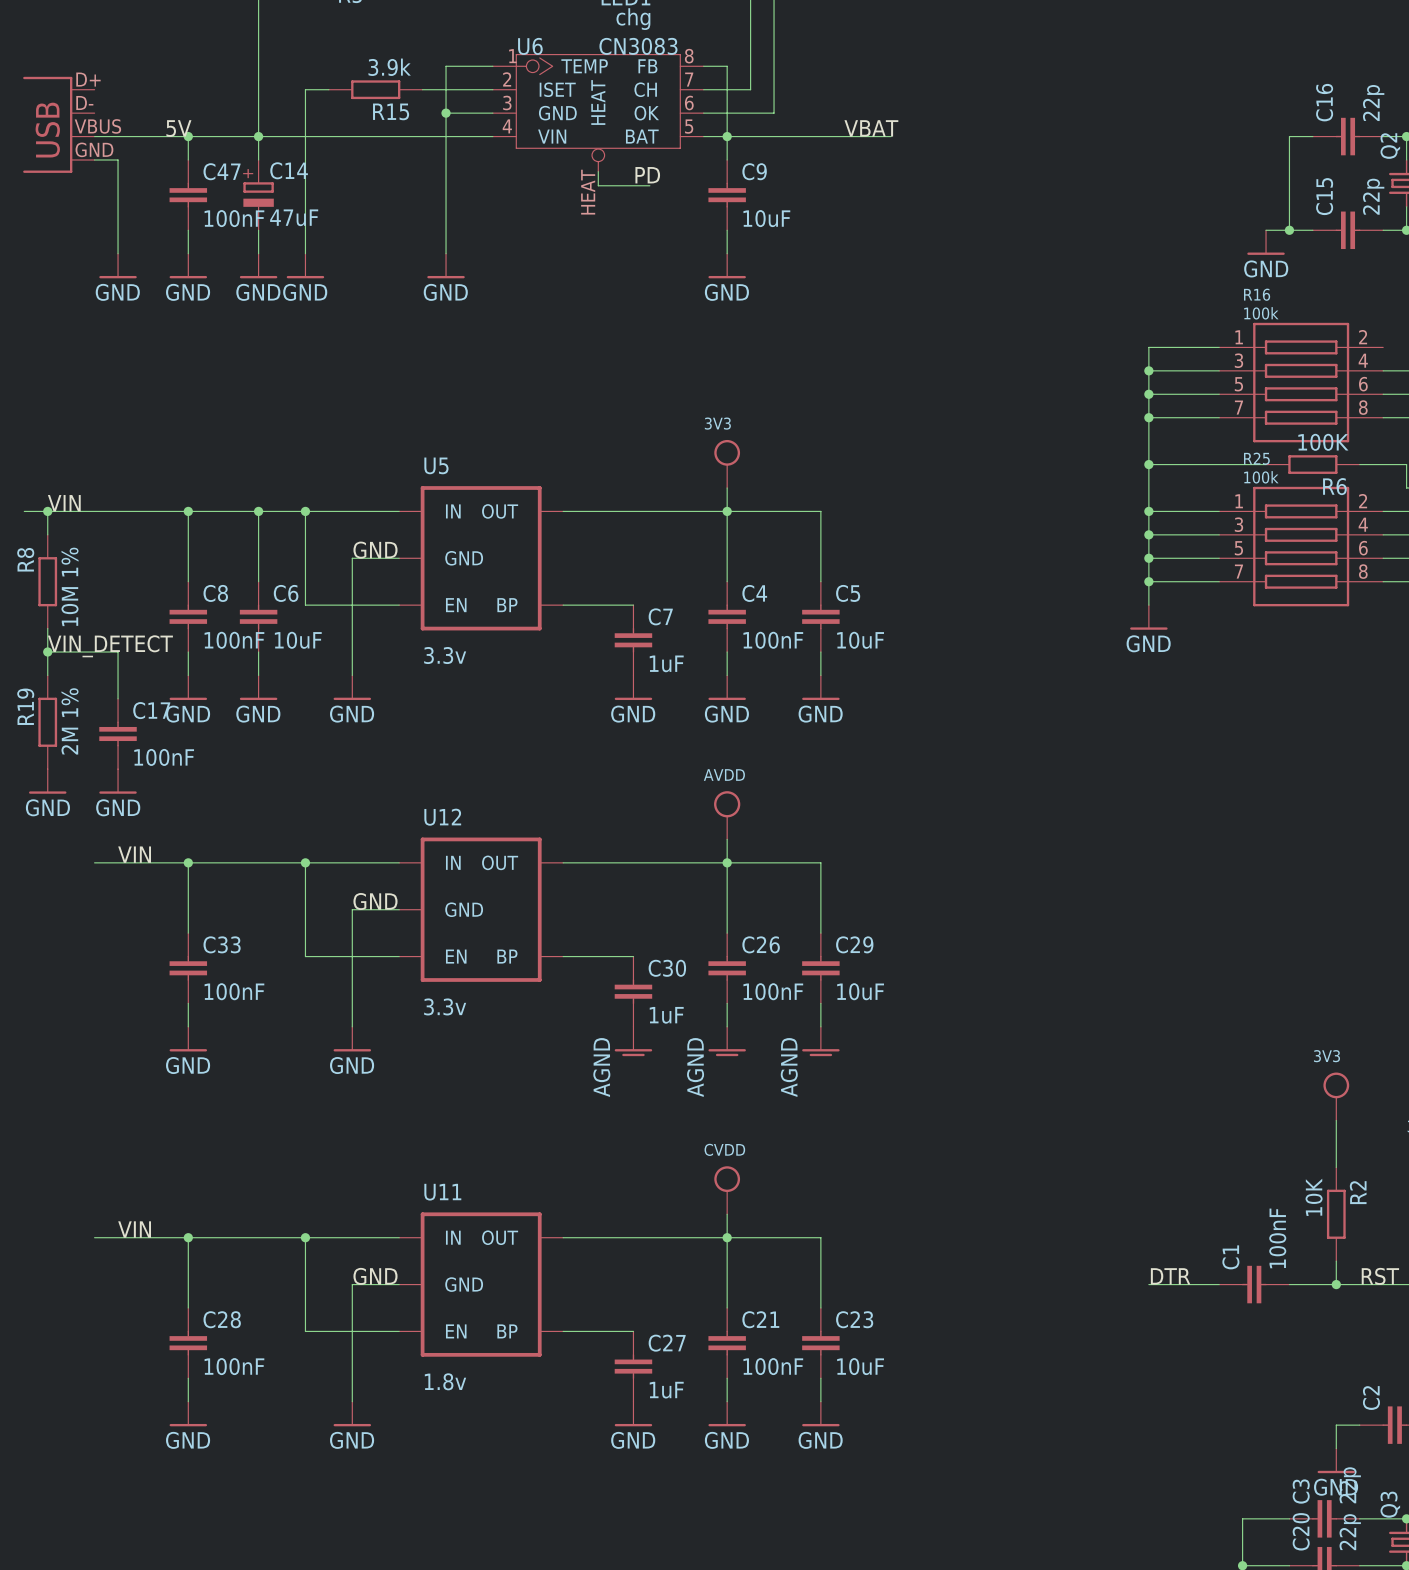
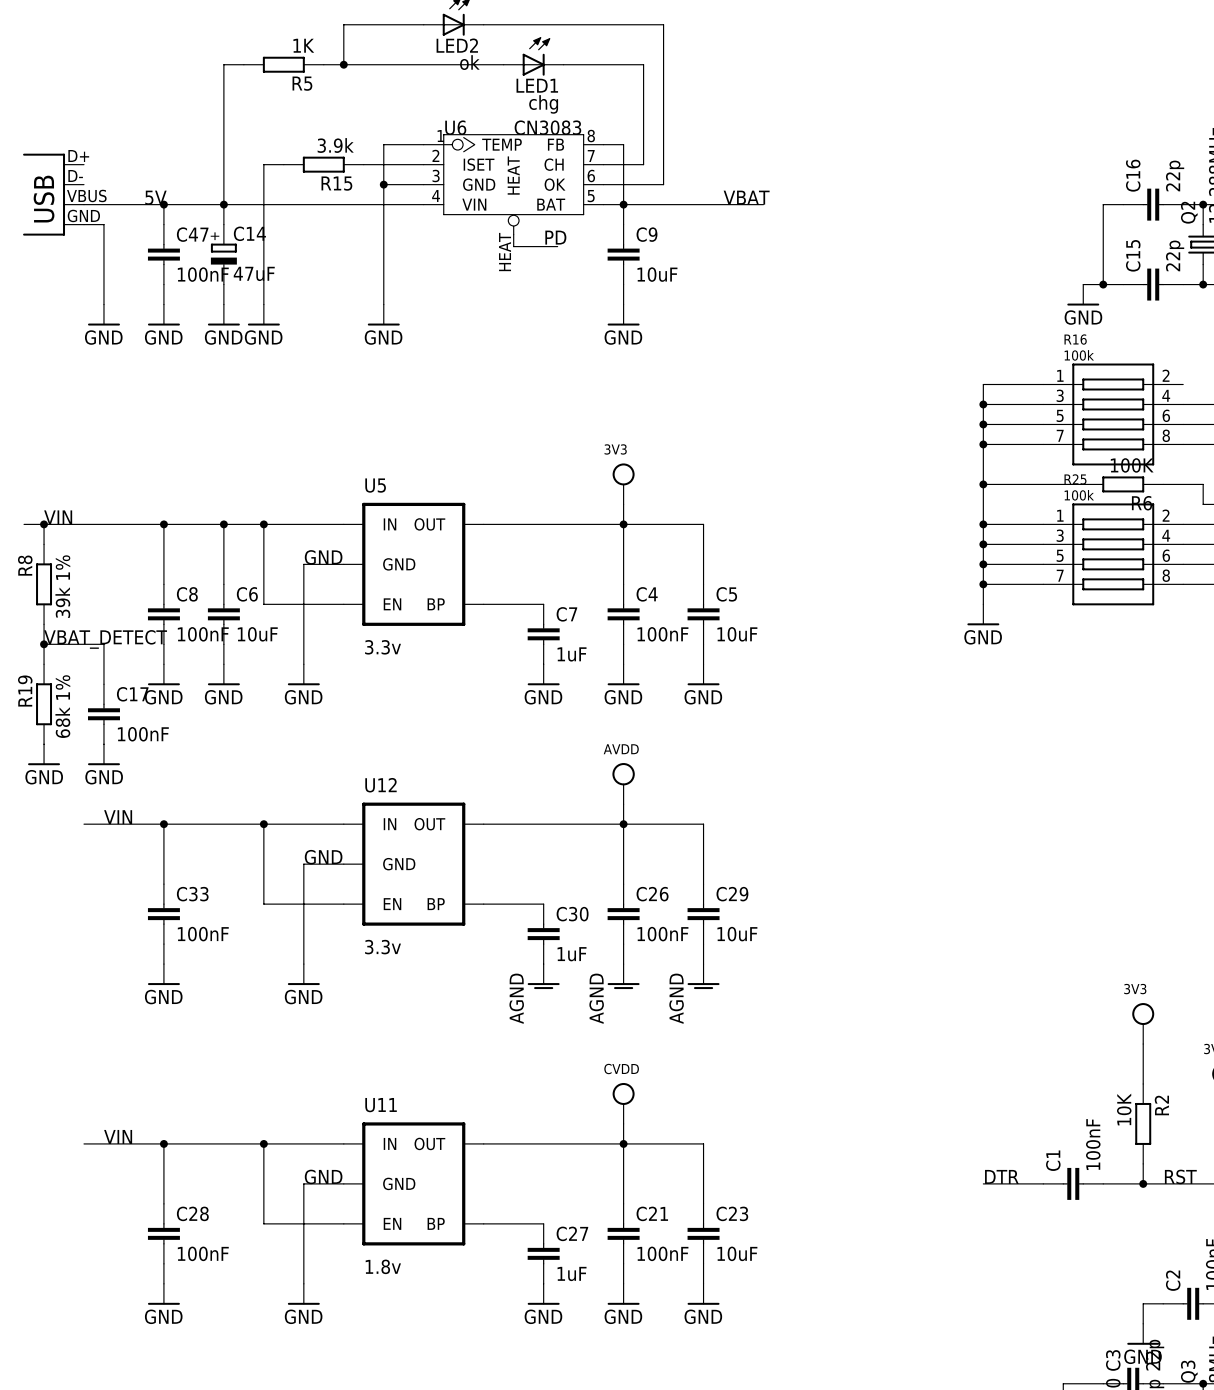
R8 value: 10M 1% (70, 586) -> 39k 1% (62, 586)
label: VIN_DETECT (110, 646) -> VBAT_DETECT (105, 639)
R19 value: 2M 1% (70, 721) -> 68k 1% (62, 706)

